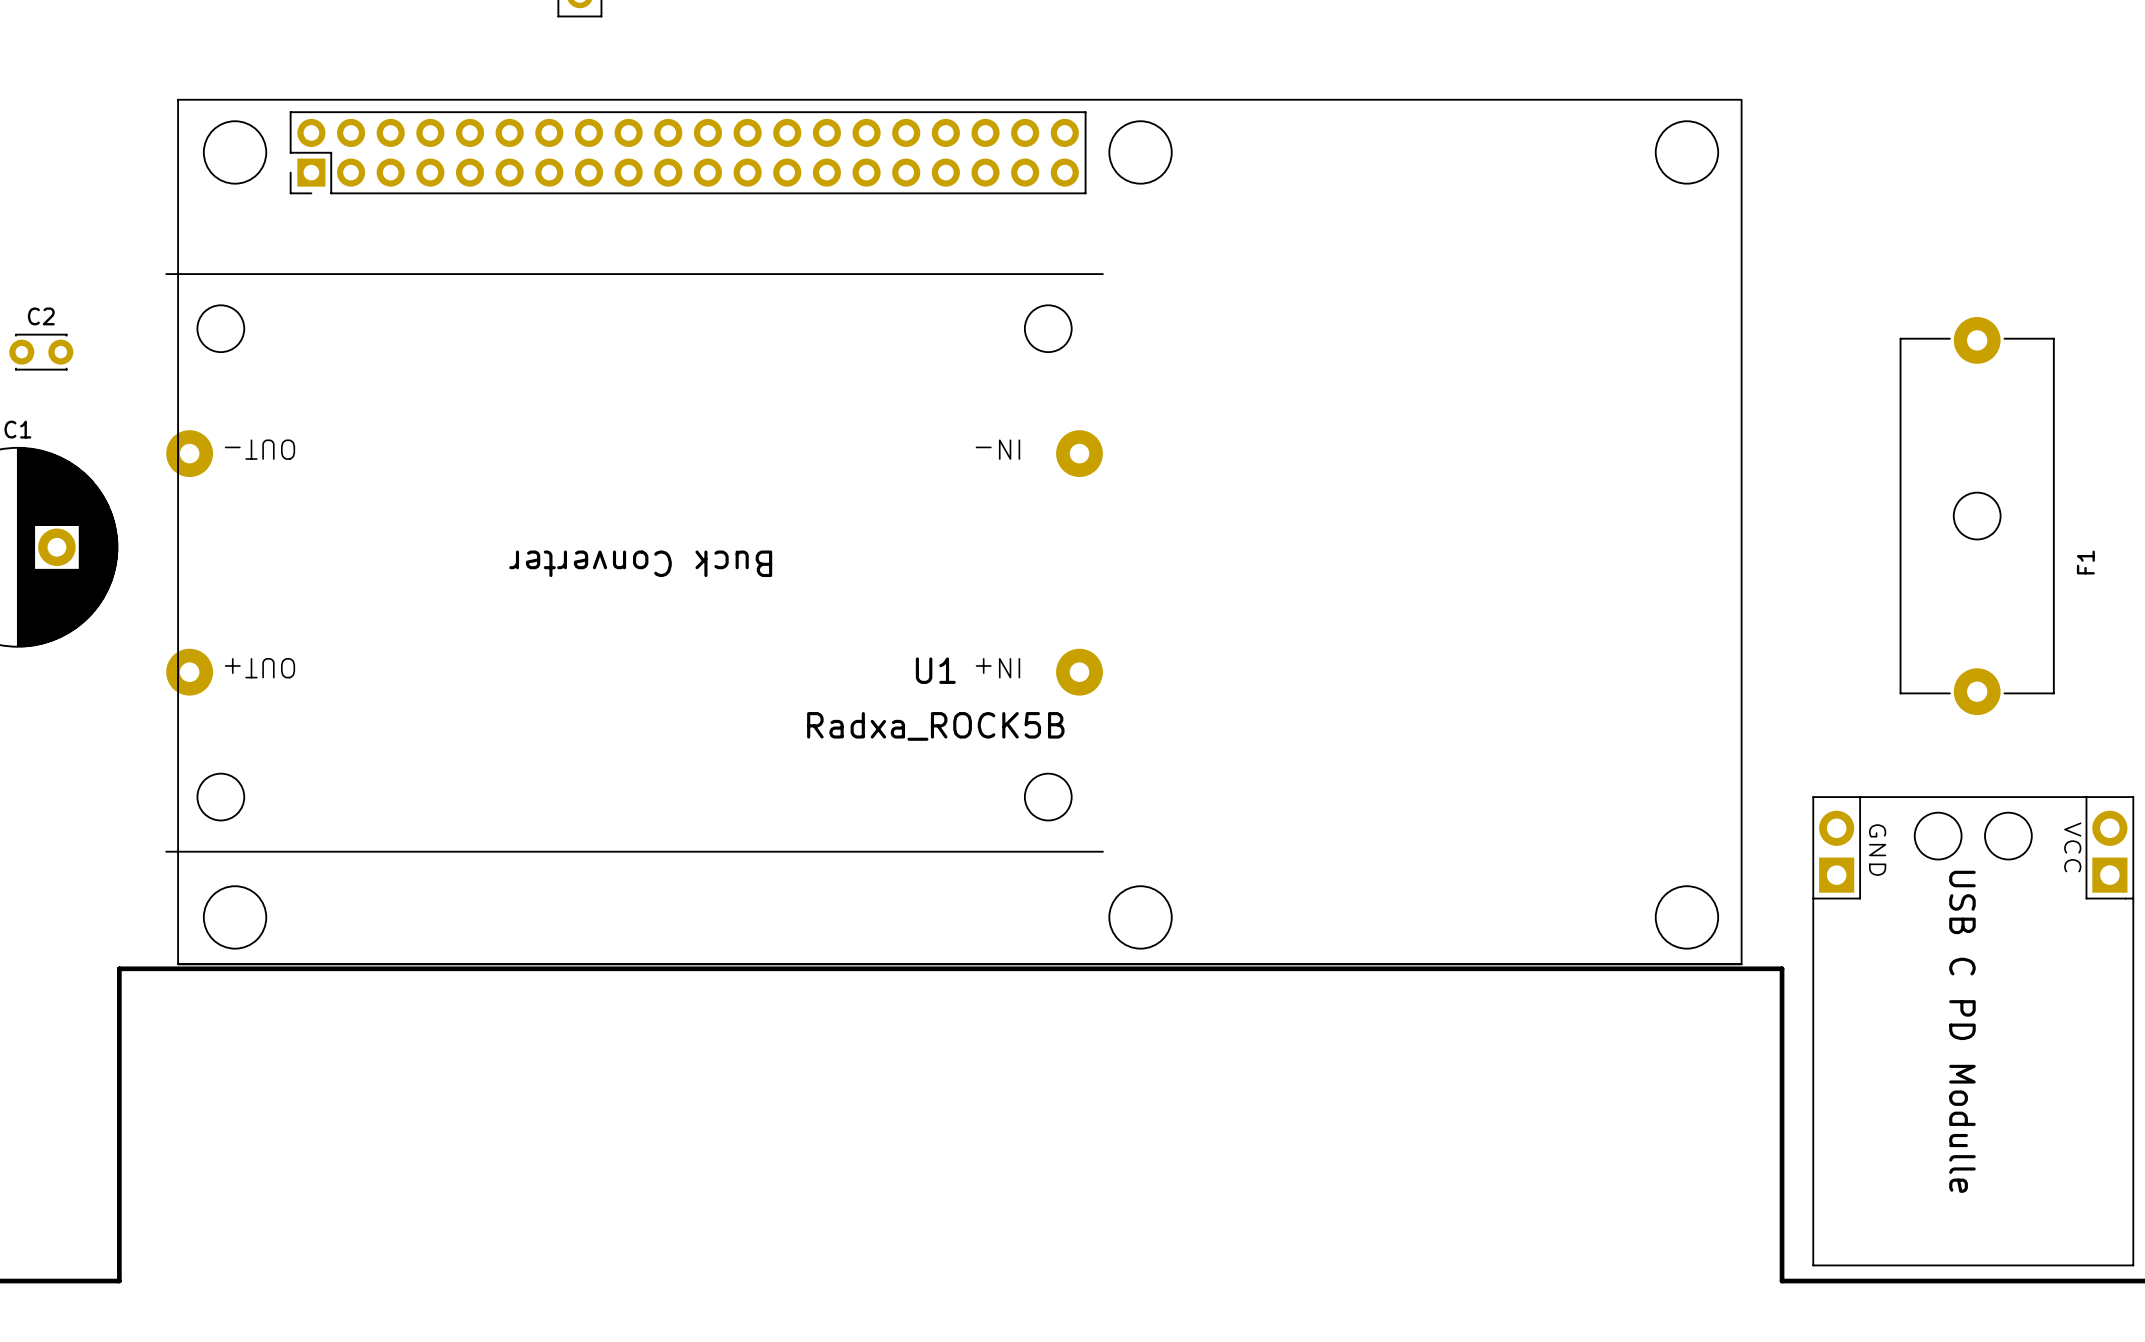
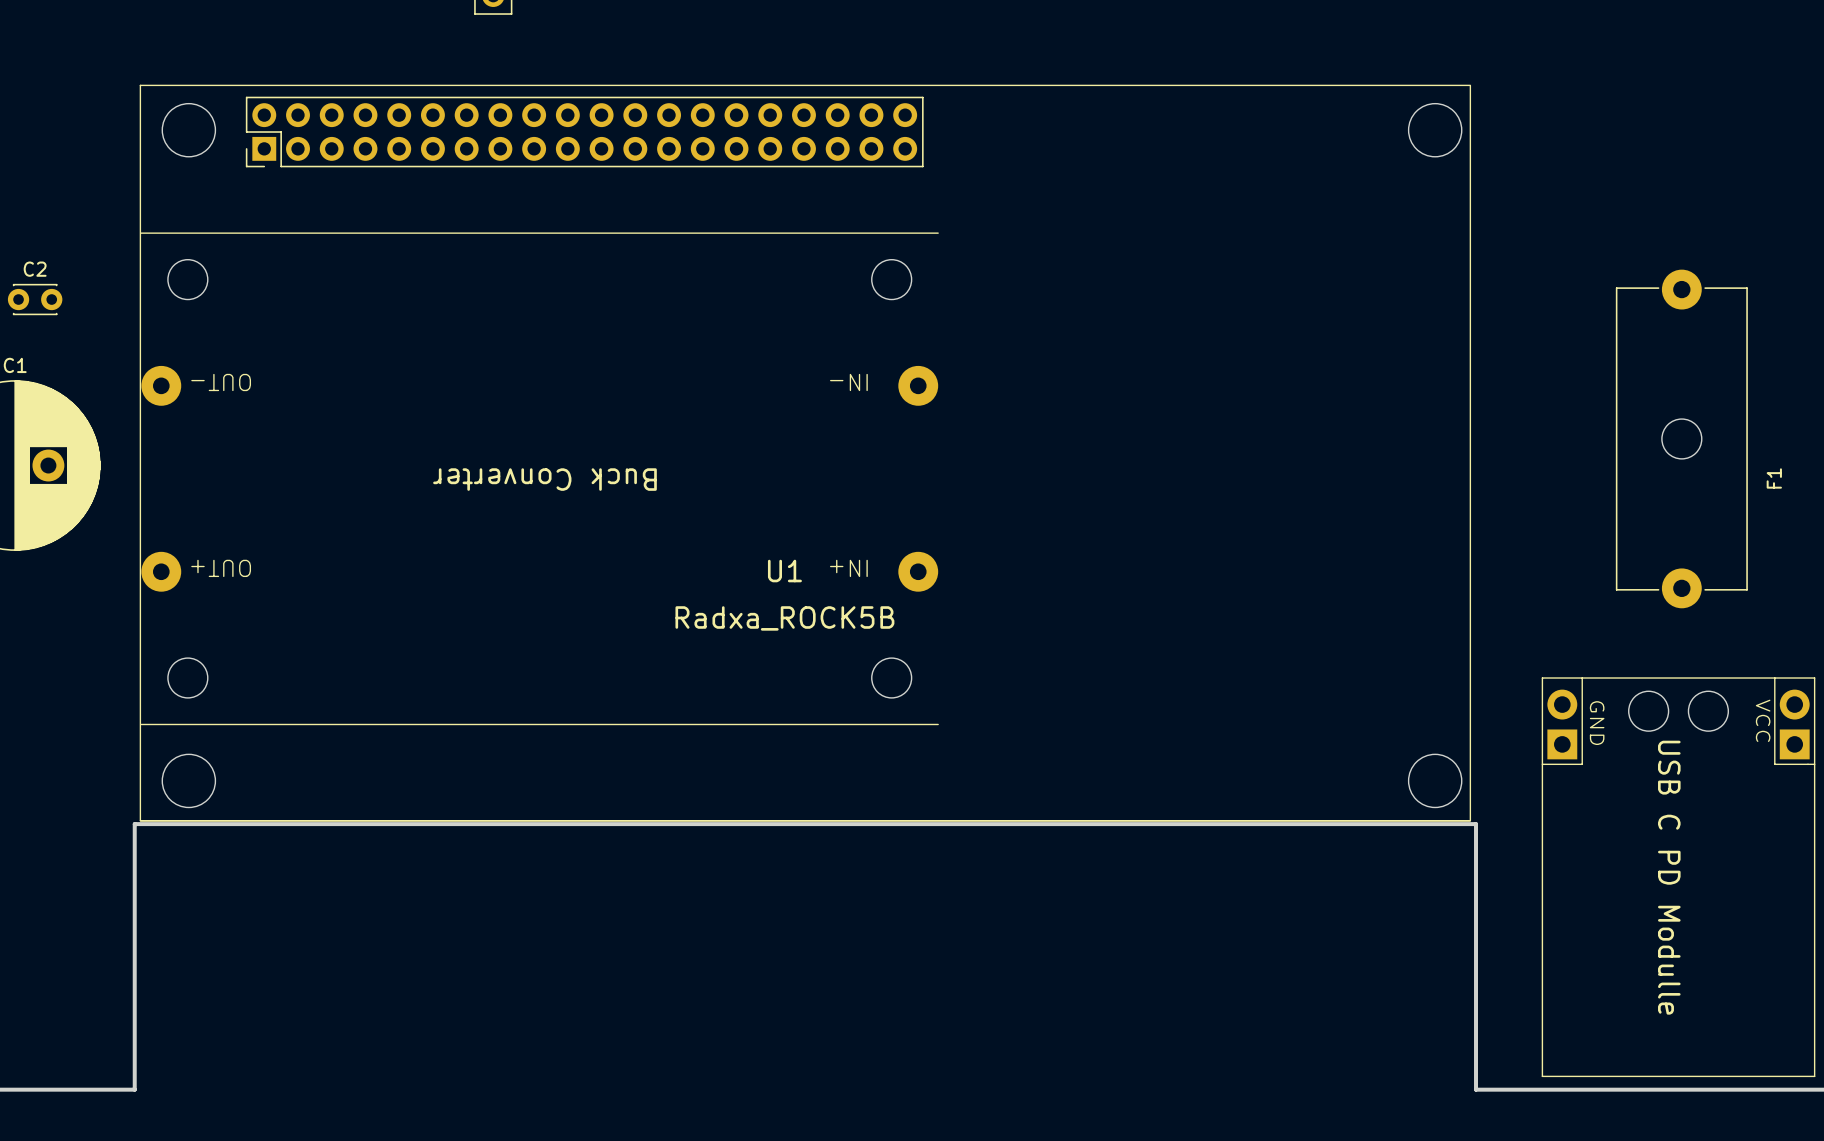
U1 footprint: [177, 98, 1743, 966] -> [139, 84, 1472, 822]
board edge: (158, 968) (119, 968) (119, 1281) -> (134, 824) (134, 1089) (101, 1089)
board edge: (1735, 968) (1782, 968) (1782, 1281) -> (1476, 824) (1476, 1089) (1515, 1089)

